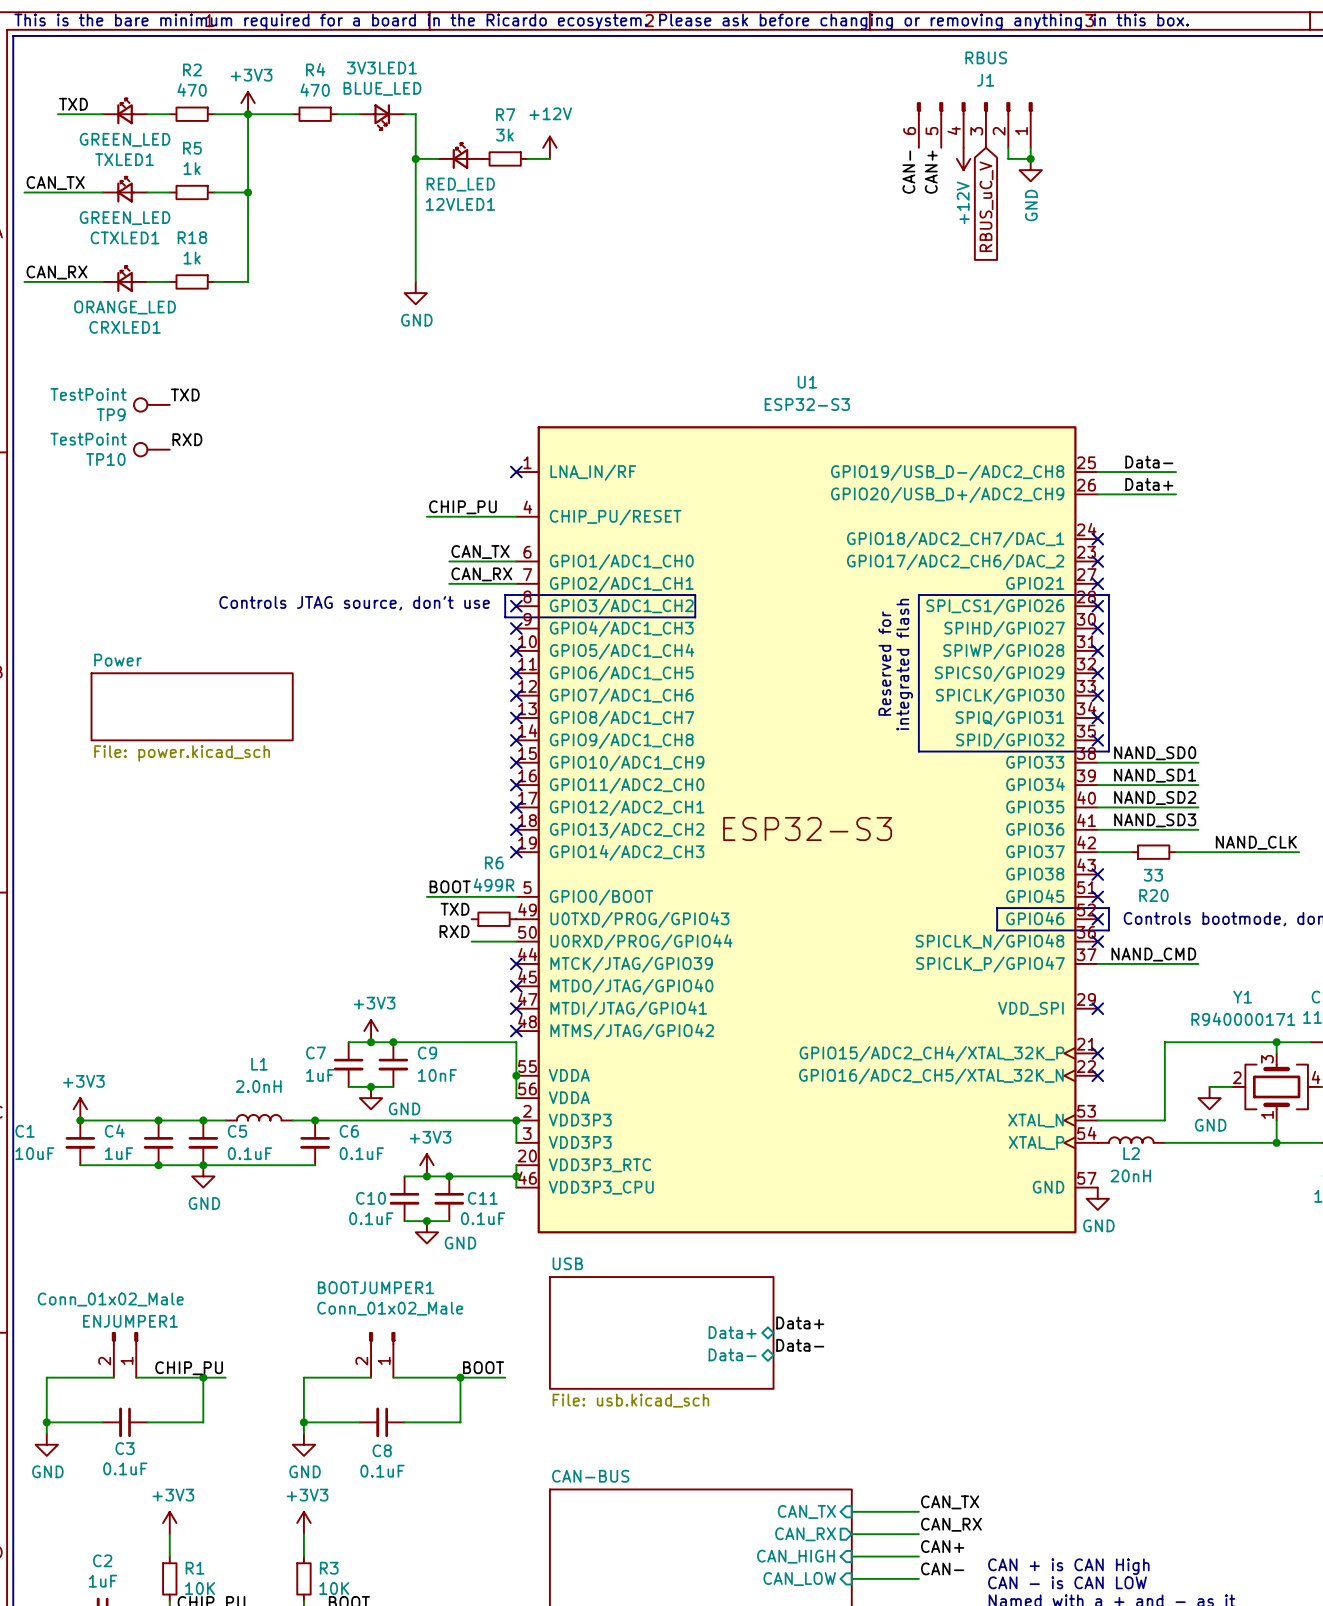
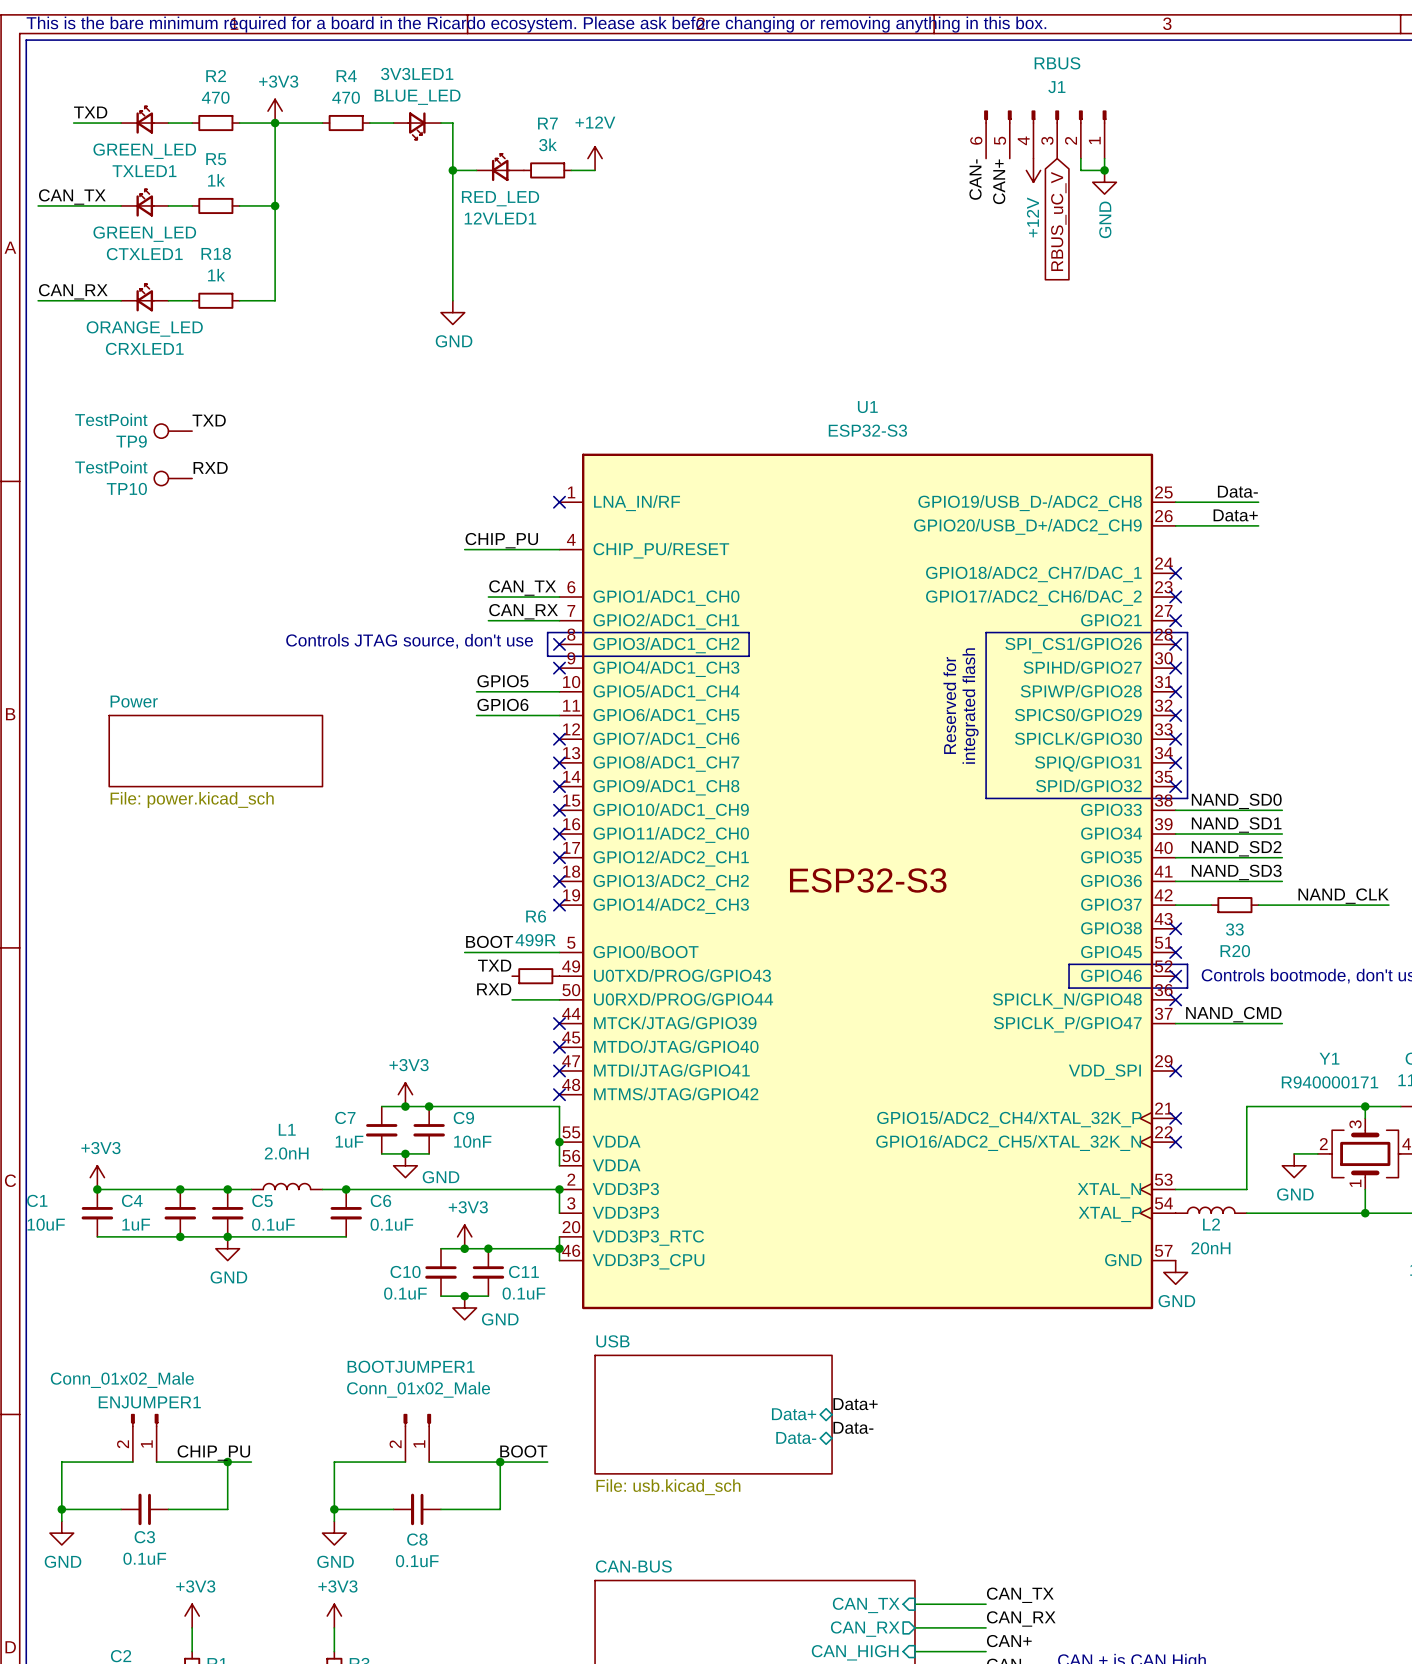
label: none -> GPIO5 (502, 681)
wire: none -> (476, 691) (559, 691)
no-connect mark: (516, 650) -> none
label: none -> GPIO6 (502, 704)
wire: none -> (476, 715) (559, 715)
no-connect mark: (516, 673) -> none

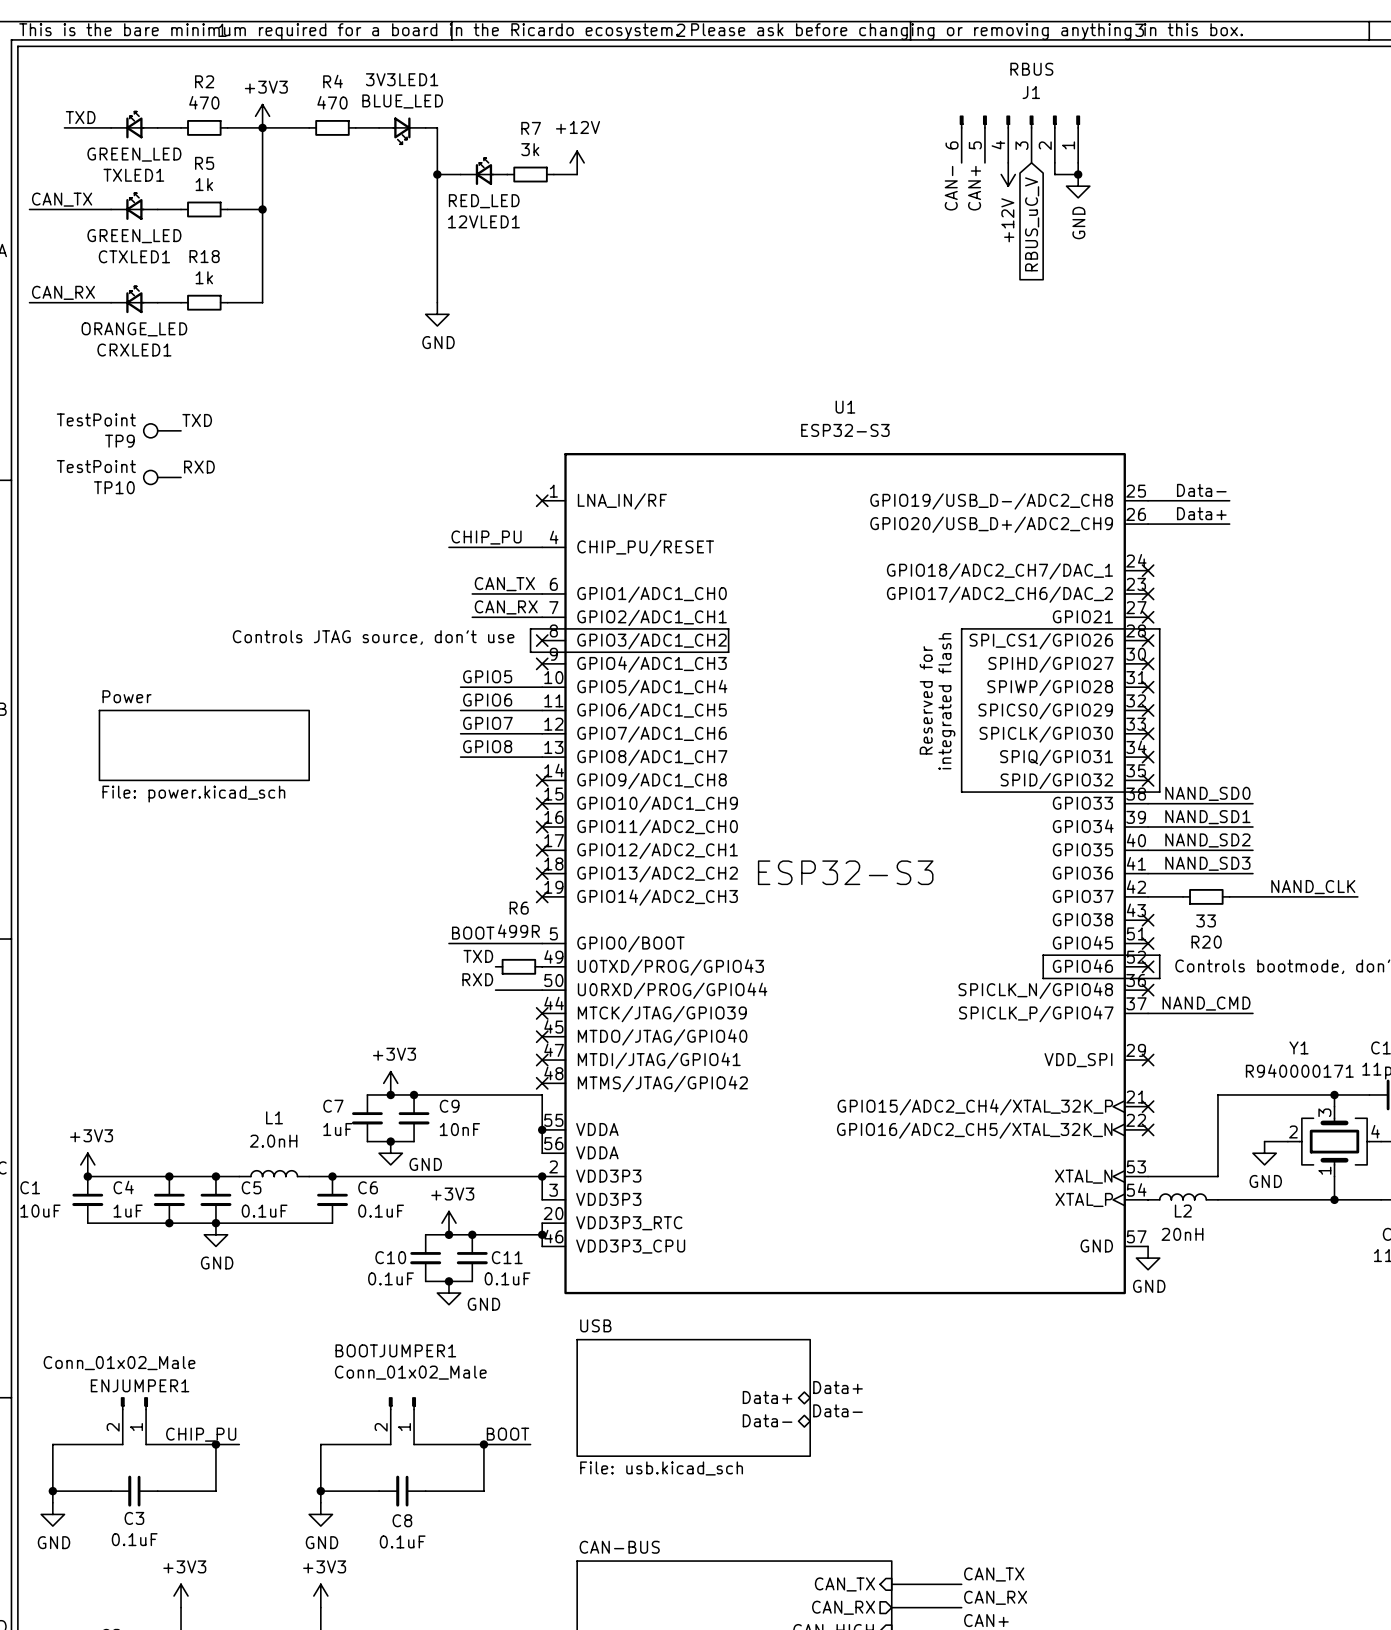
label: none -> GPIO7 (487, 723)
wire: none -> (460, 733) (542, 733)
no-connect mark: (559, 739) -> none
label: none -> GPIO8 (487, 746)
wire: none -> (460, 757) (542, 757)
no-connect mark: (559, 762) -> none

